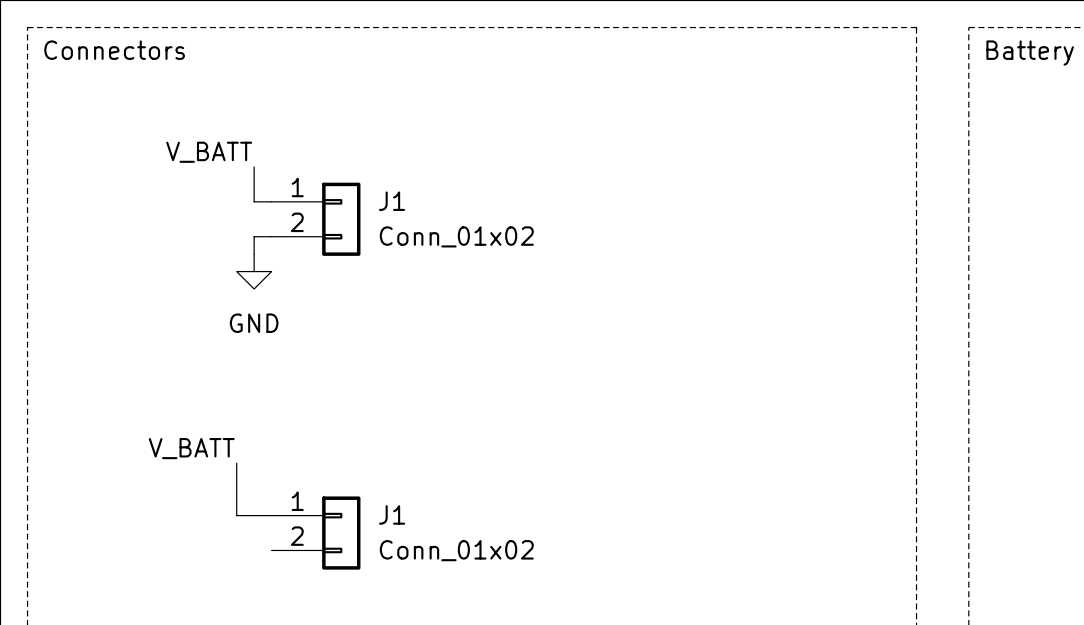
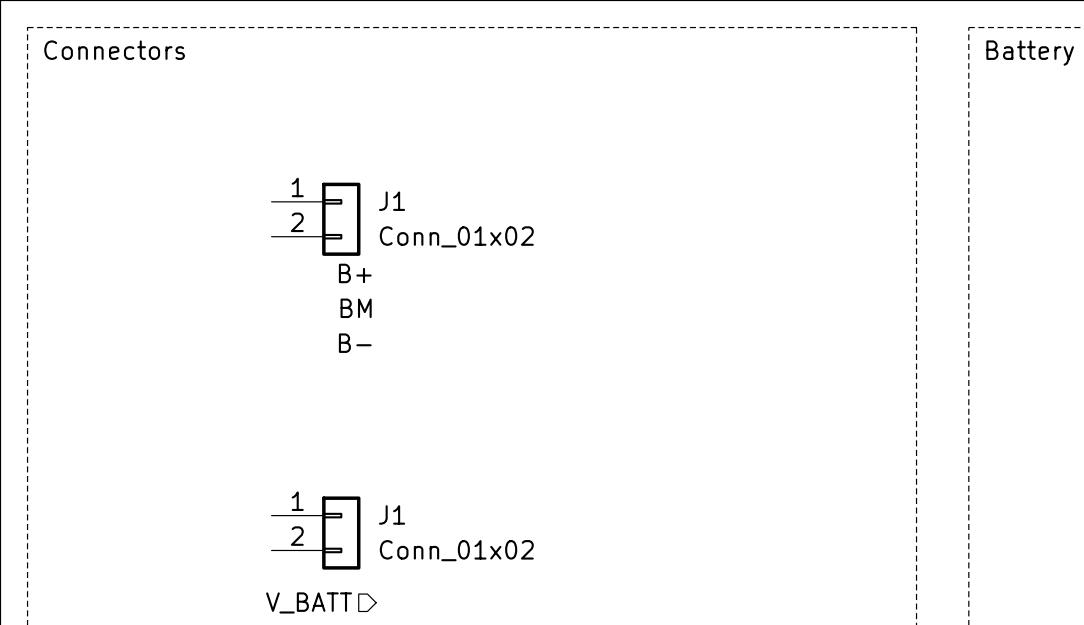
label: V_BATT (209, 152) -> none
wire: (254, 166) (254, 201) (271, 201) -> none
wire: (271, 236) (254, 236) (254, 254) -> none
power symbol: GND (254, 271) -> none
label: none -> B+ (355, 273)
label: none -> BM (356, 308)
label: none -> B- (355, 343)
label: V_BATT (191, 448) -> none
wire: (236, 463) (236, 515) (271, 515) -> none
hierarchical label: none -> V_BATT (309, 602)

